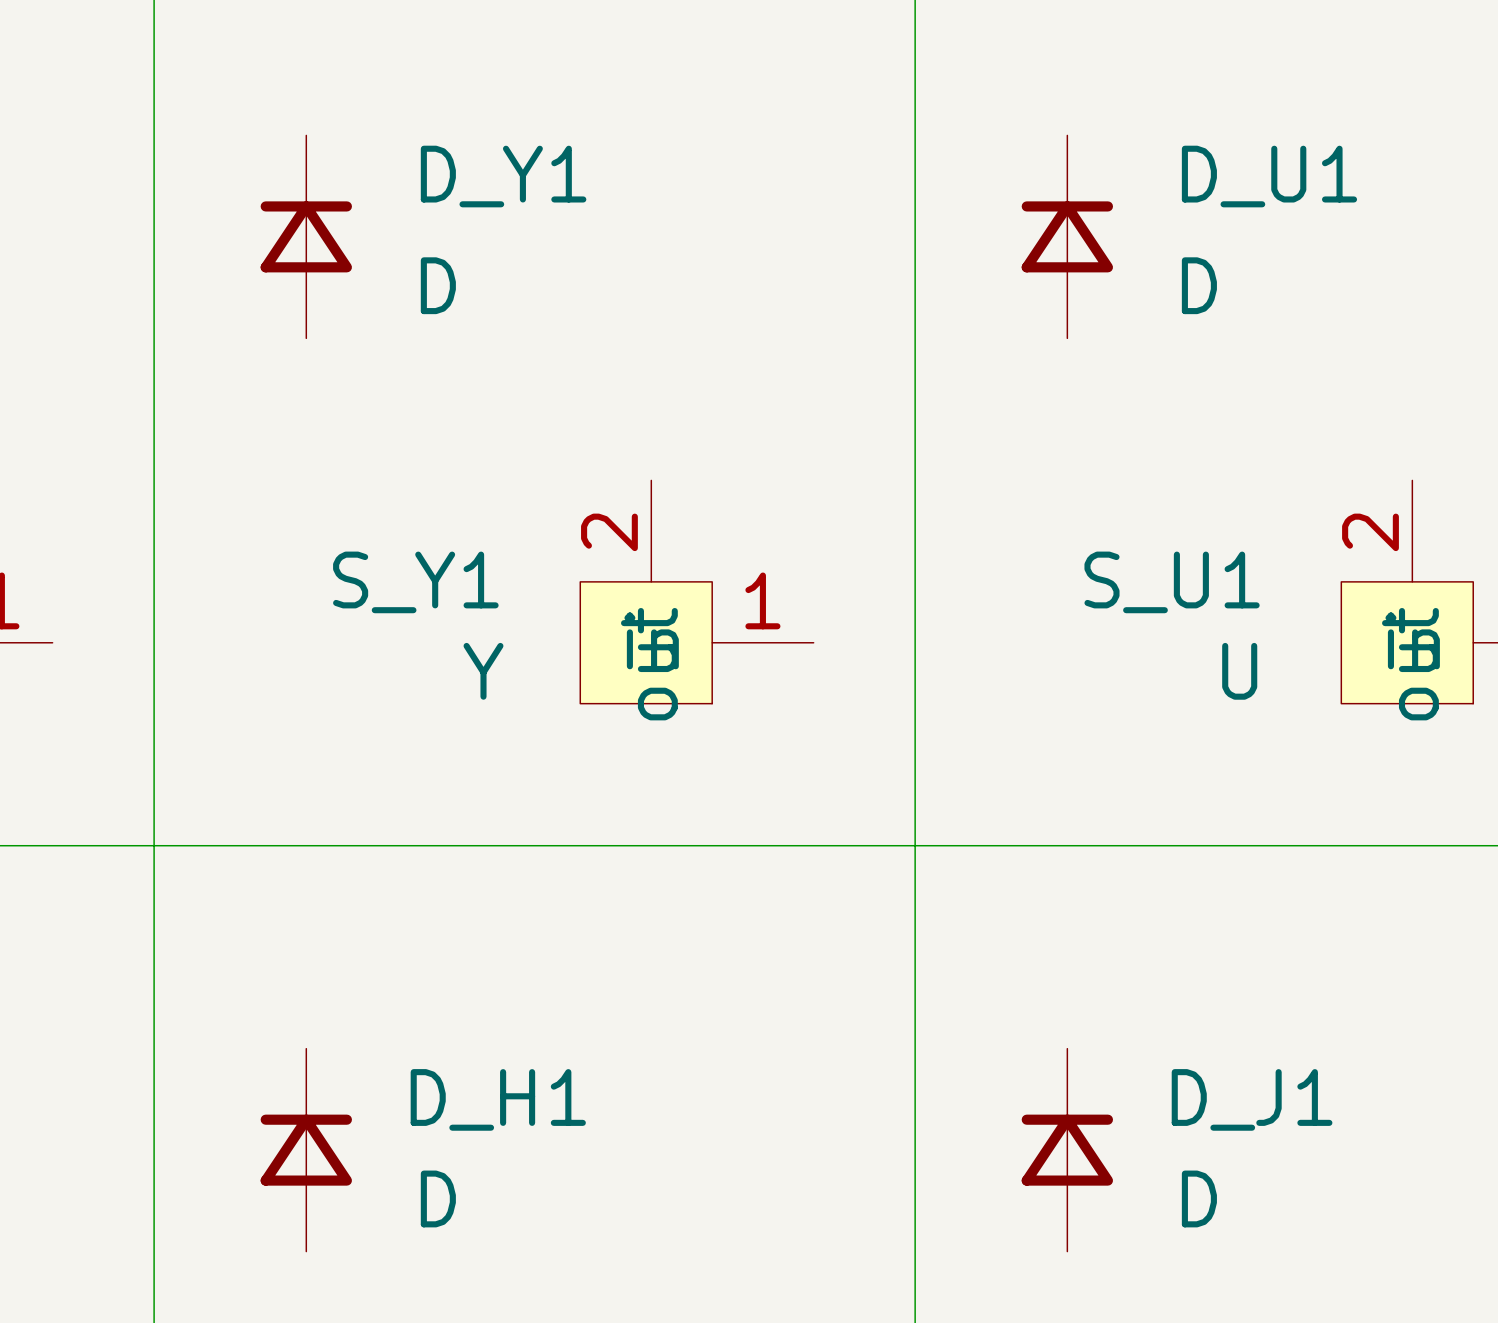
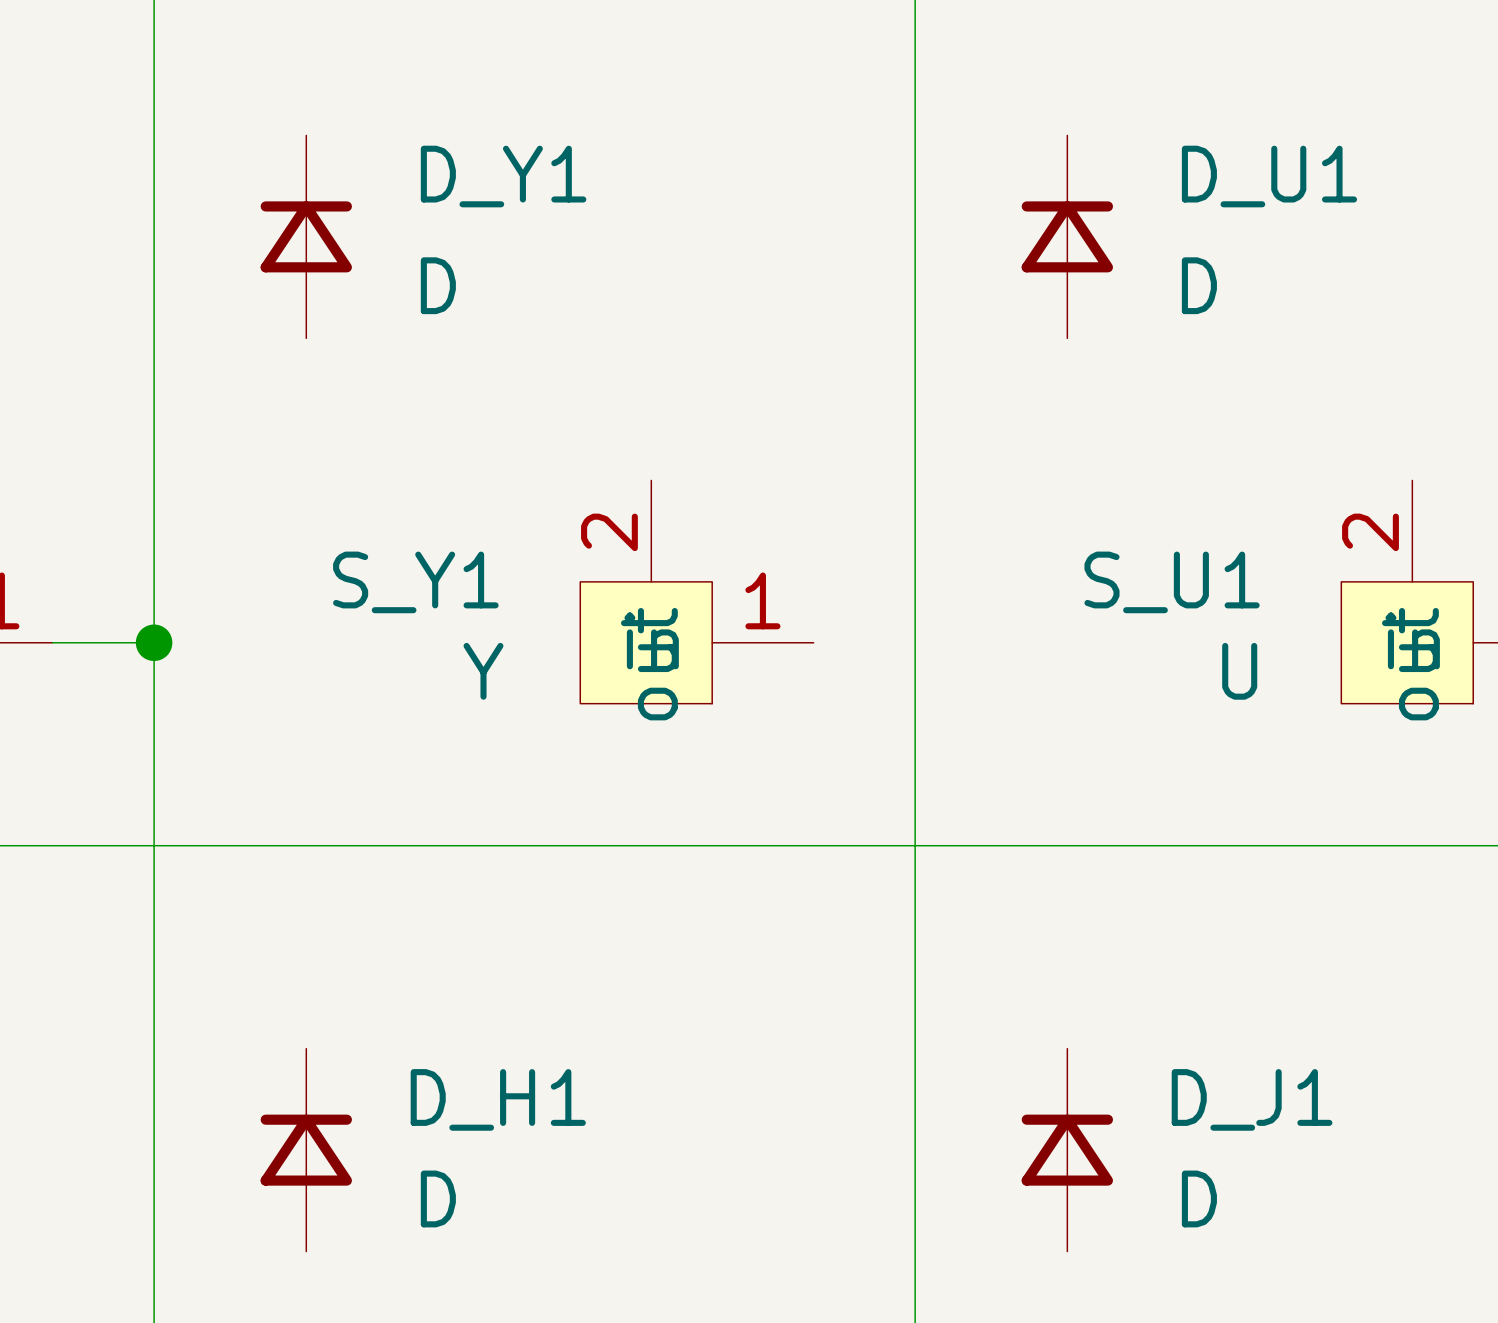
wire: none -> (52, 642) (154, 642)
junction: none -> (154, 642)

